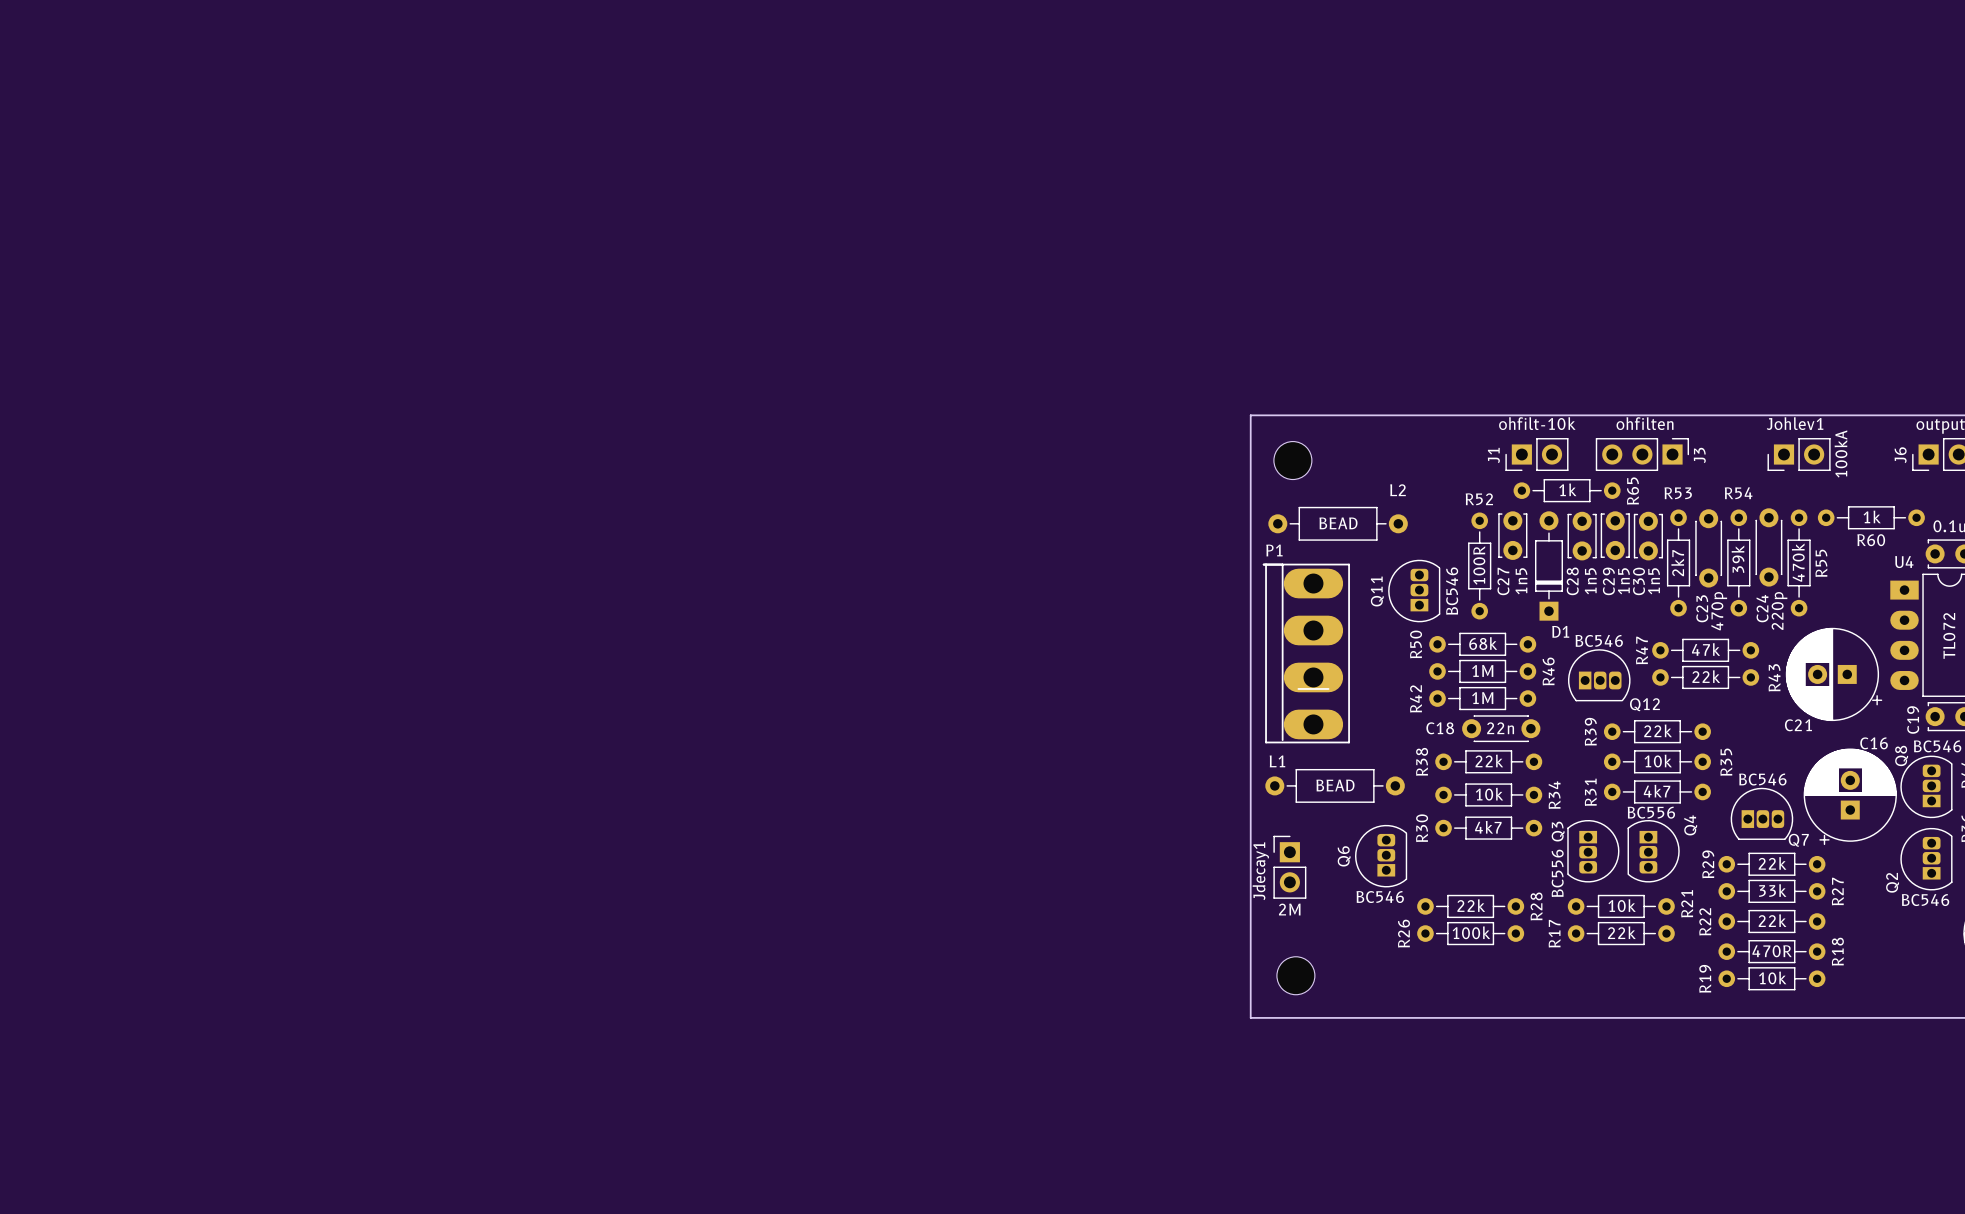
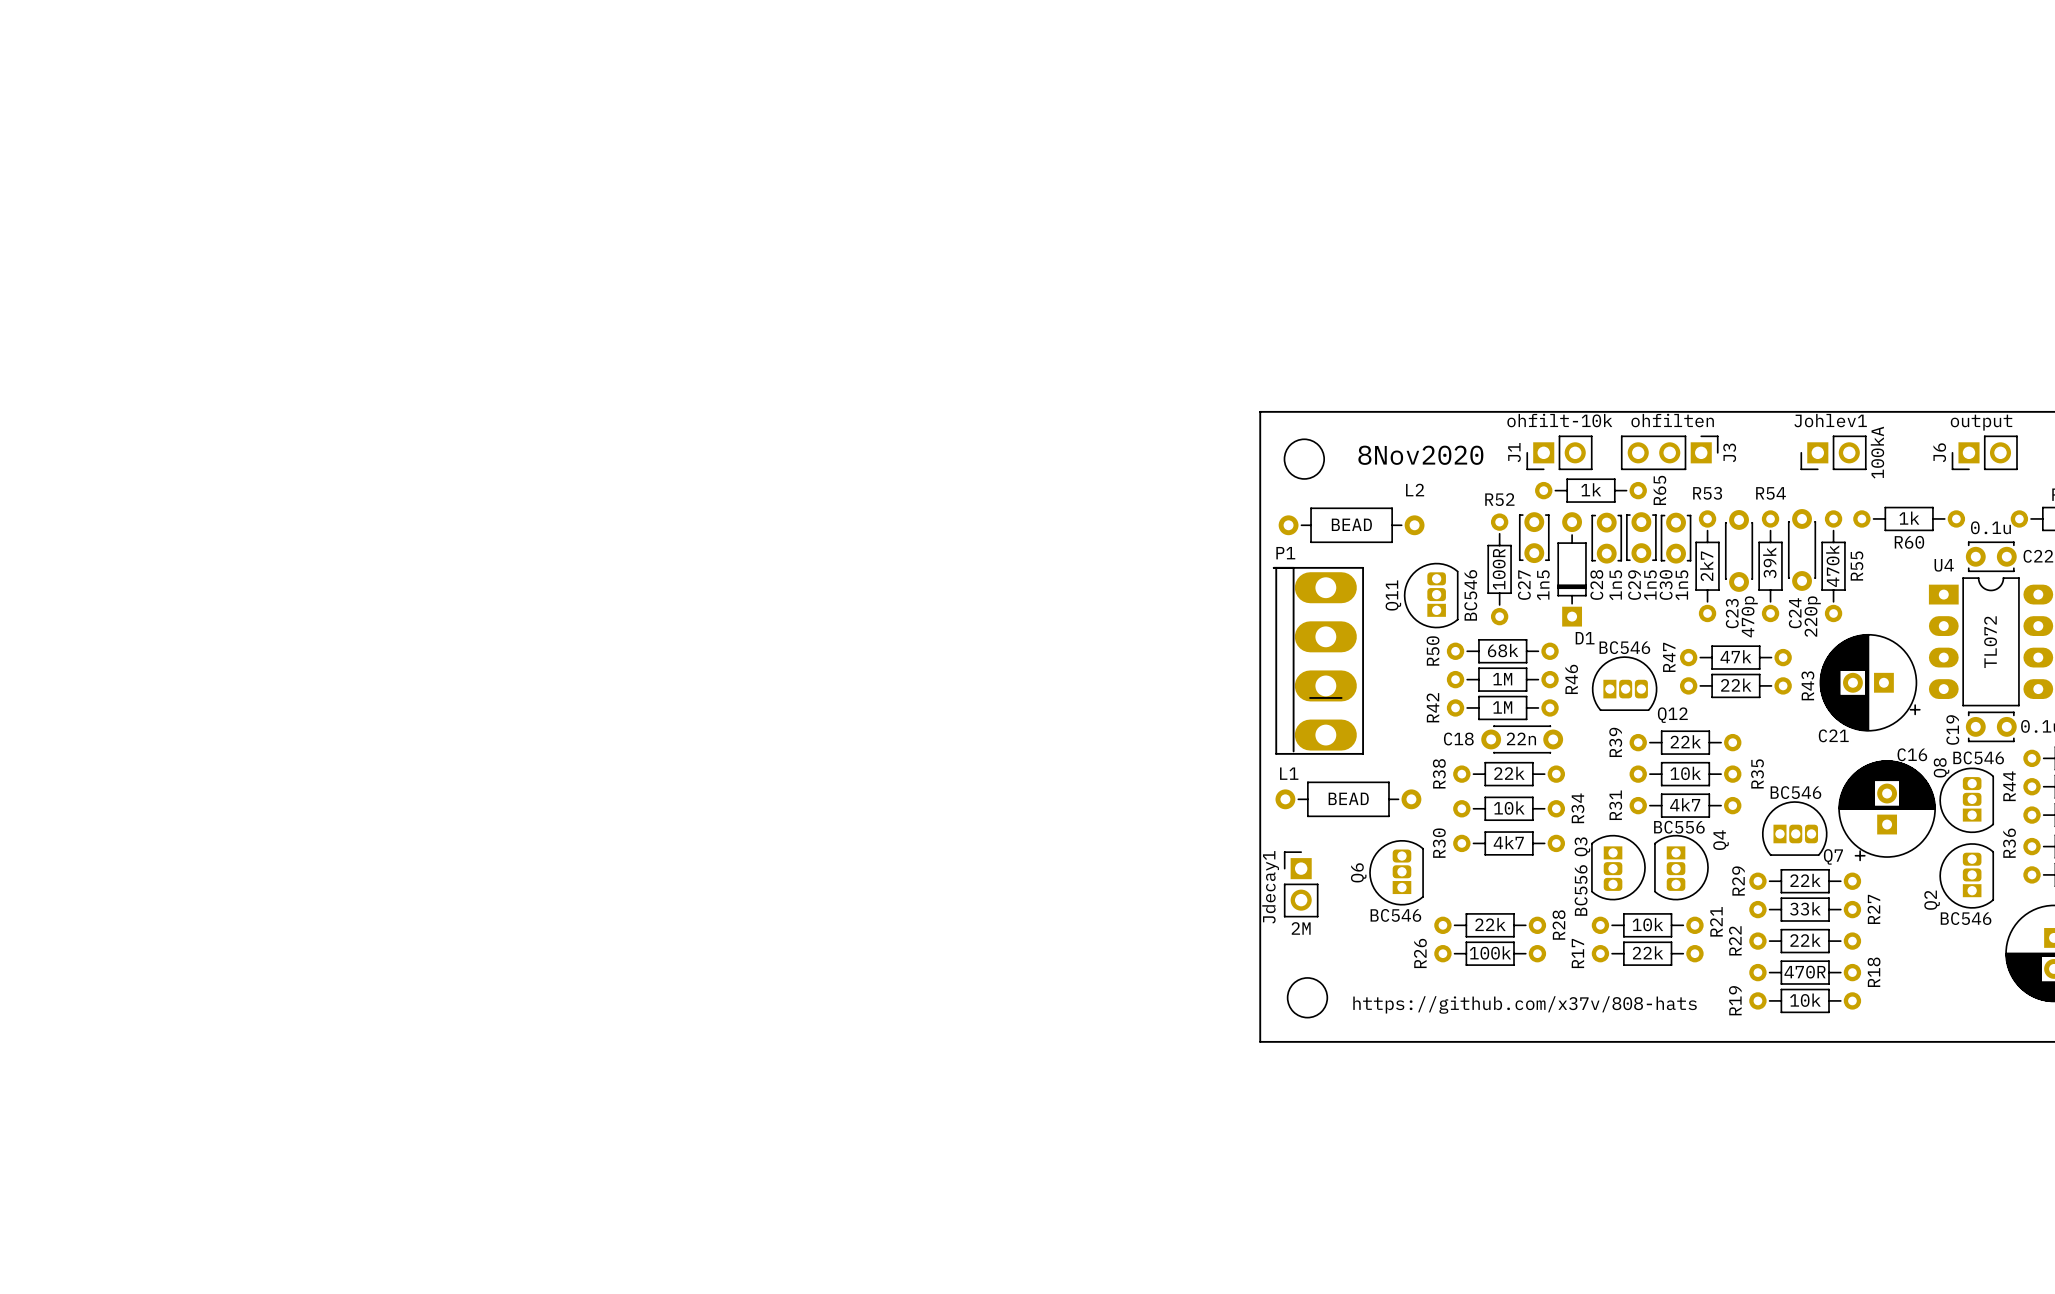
text: none -> 8Nov2020 (1420, 455)
text: none -> https://github.com/x37v/808-hats (1525, 1004)

